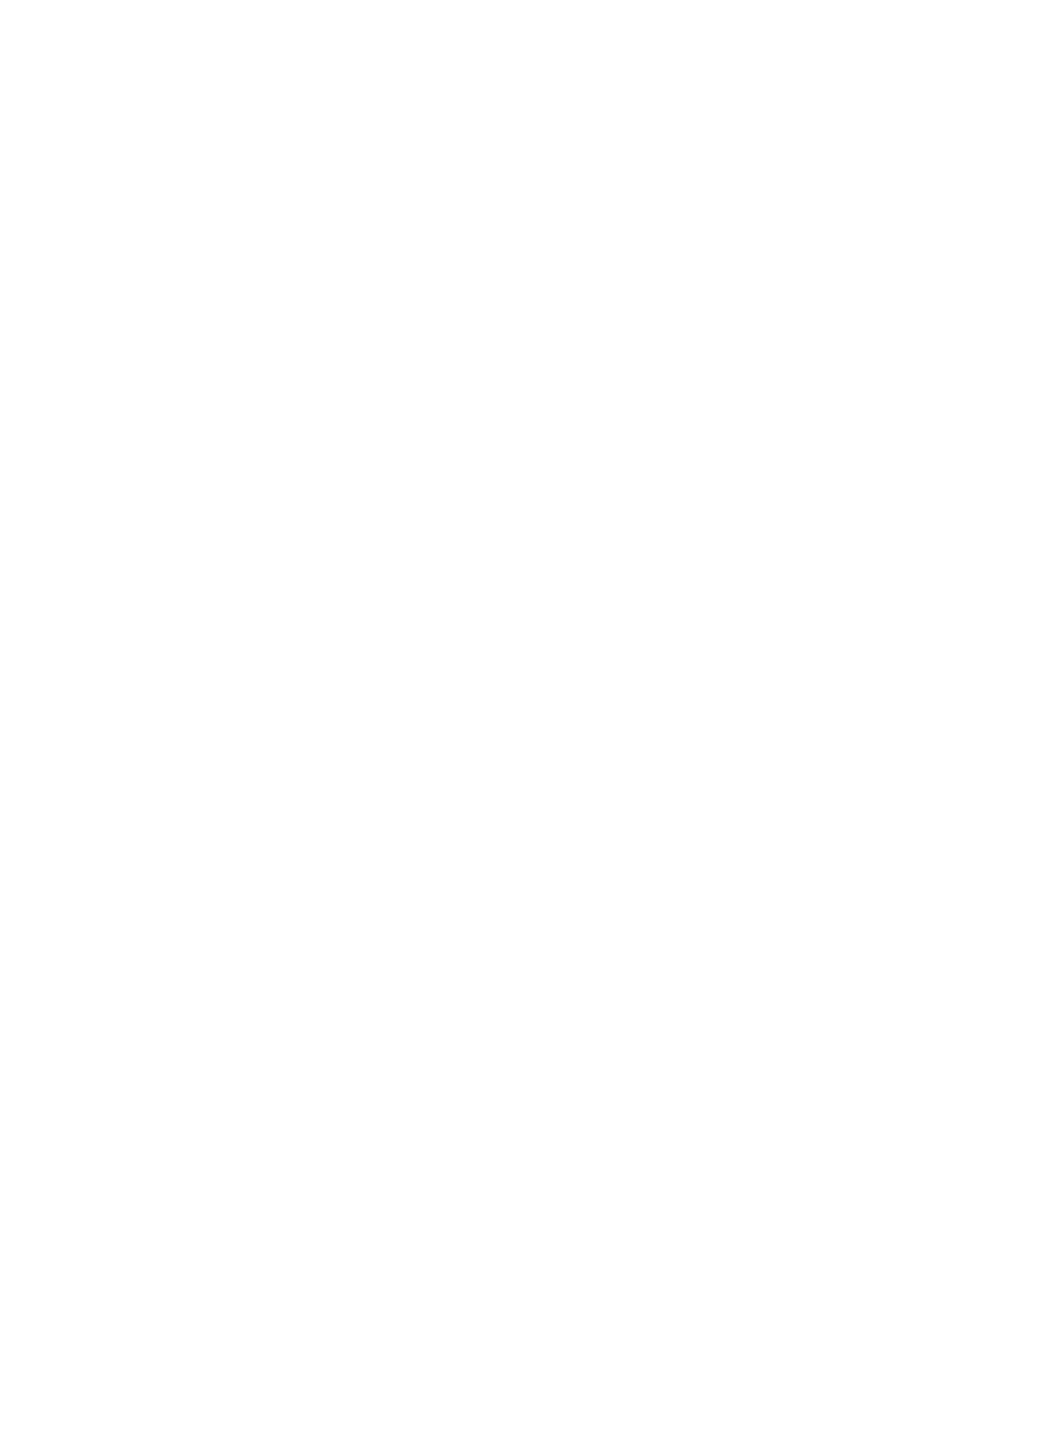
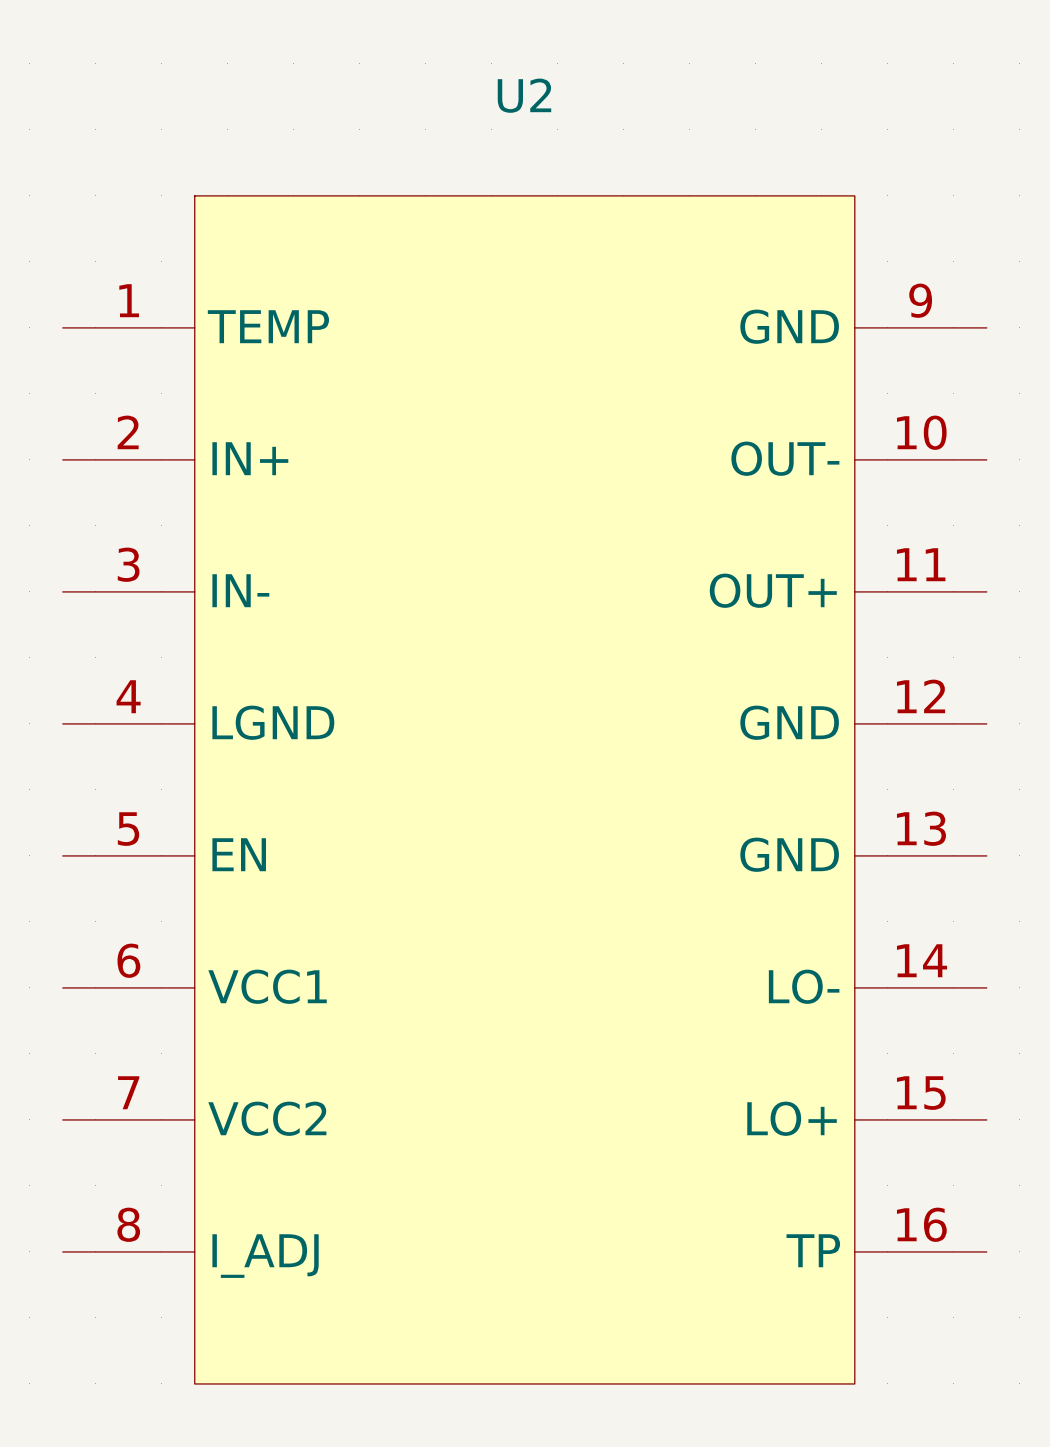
U2: none -> (524, 789)

